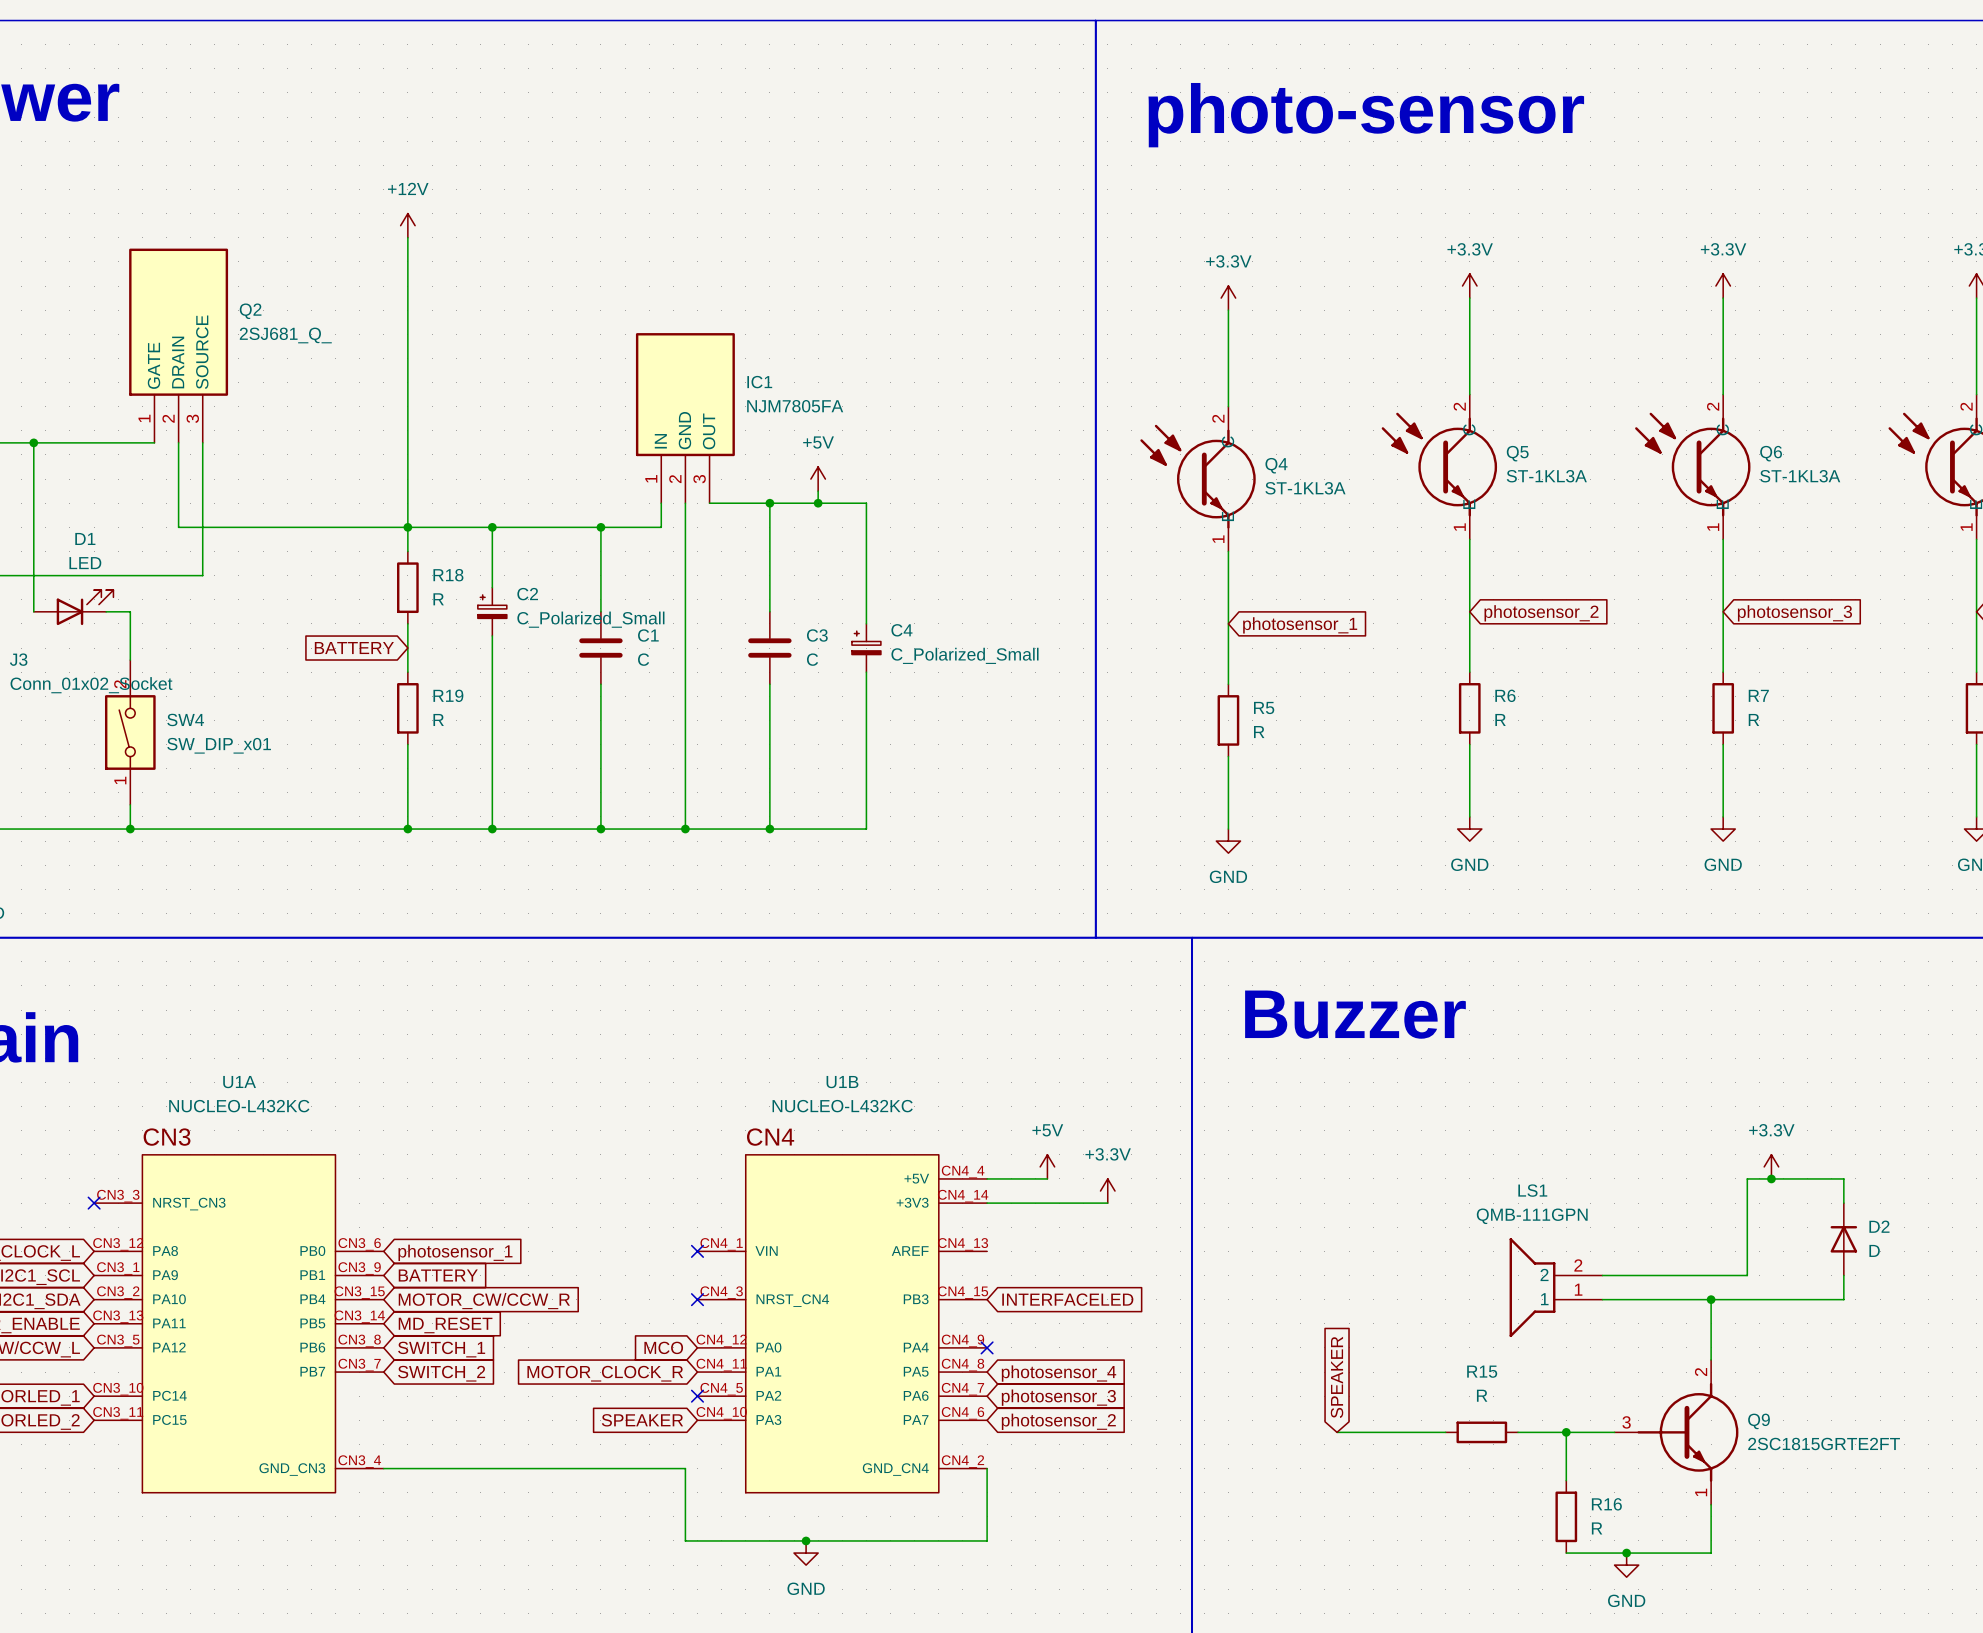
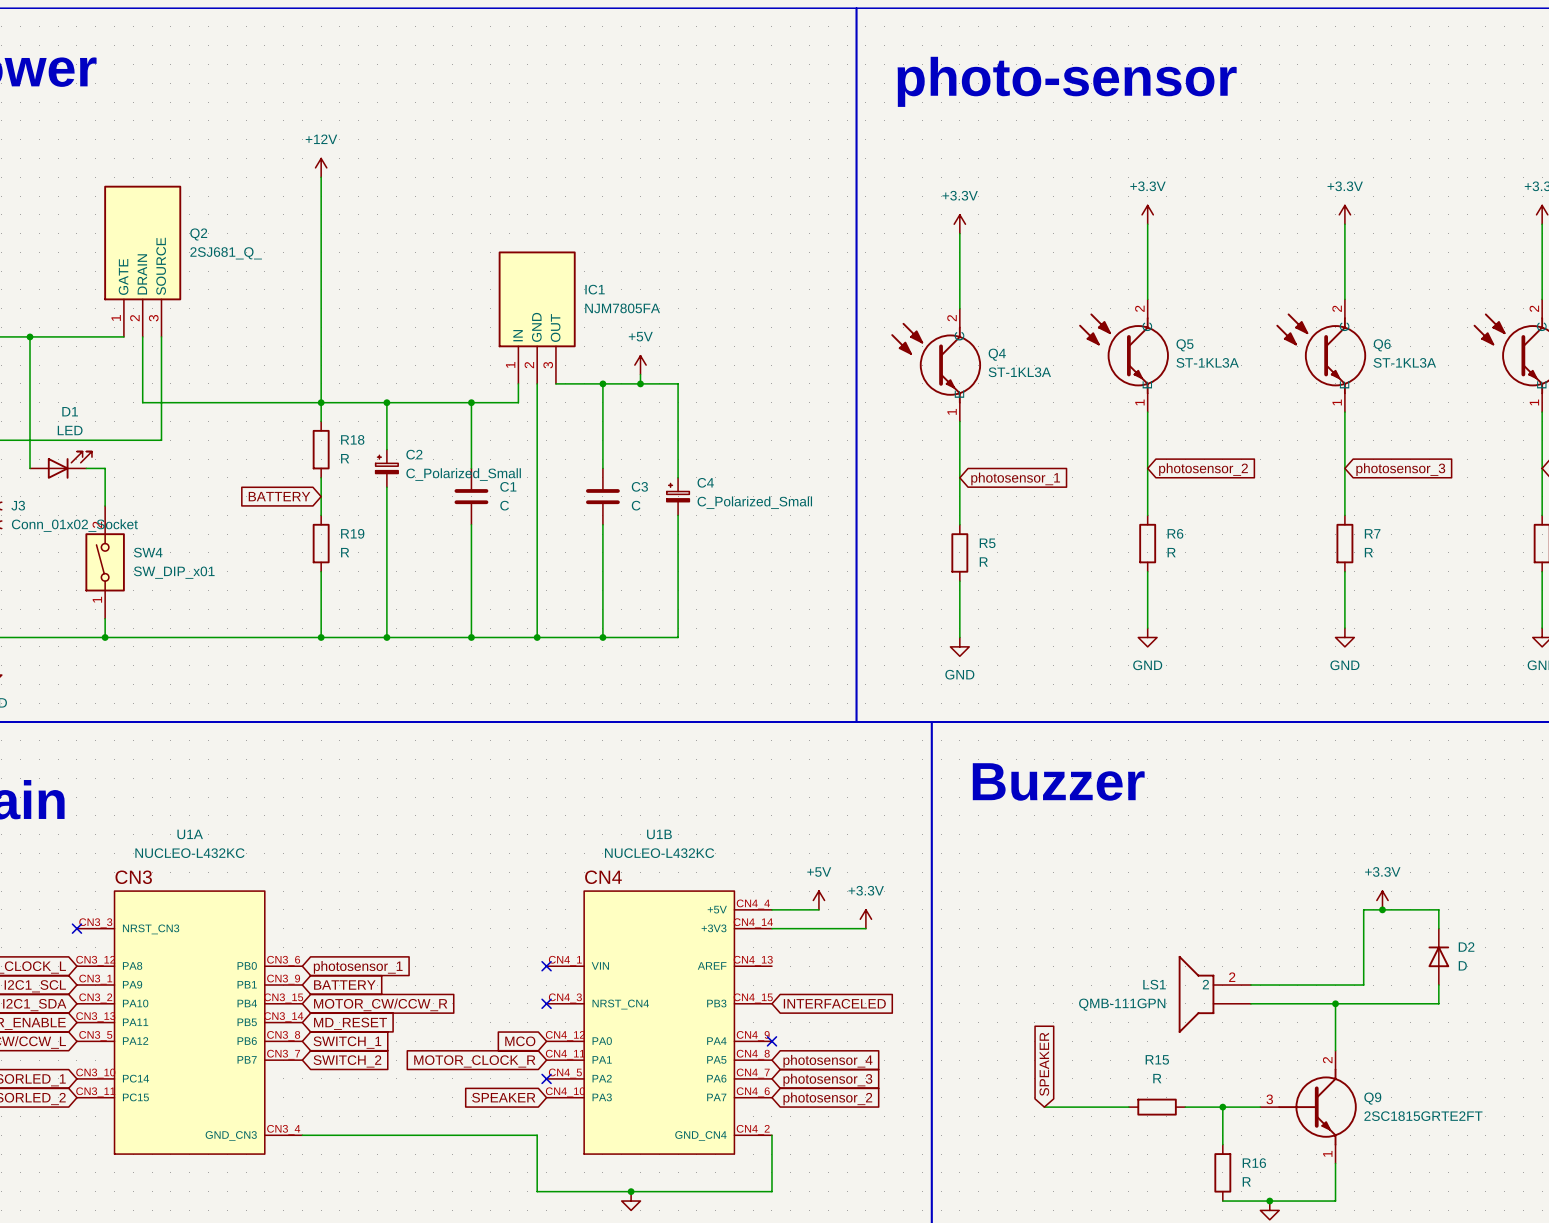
LS1 name position: LS1 (1532, 1190) -> LS1 (1154, 984)
LS1 value position: QMB-111GPN (1532, 1216) -> QMB-111GPN (1122, 1004)
LS1 pin number: 1 (1578, 1289) -> none
LS1 pin name: 1 (1544, 1299) -> none

